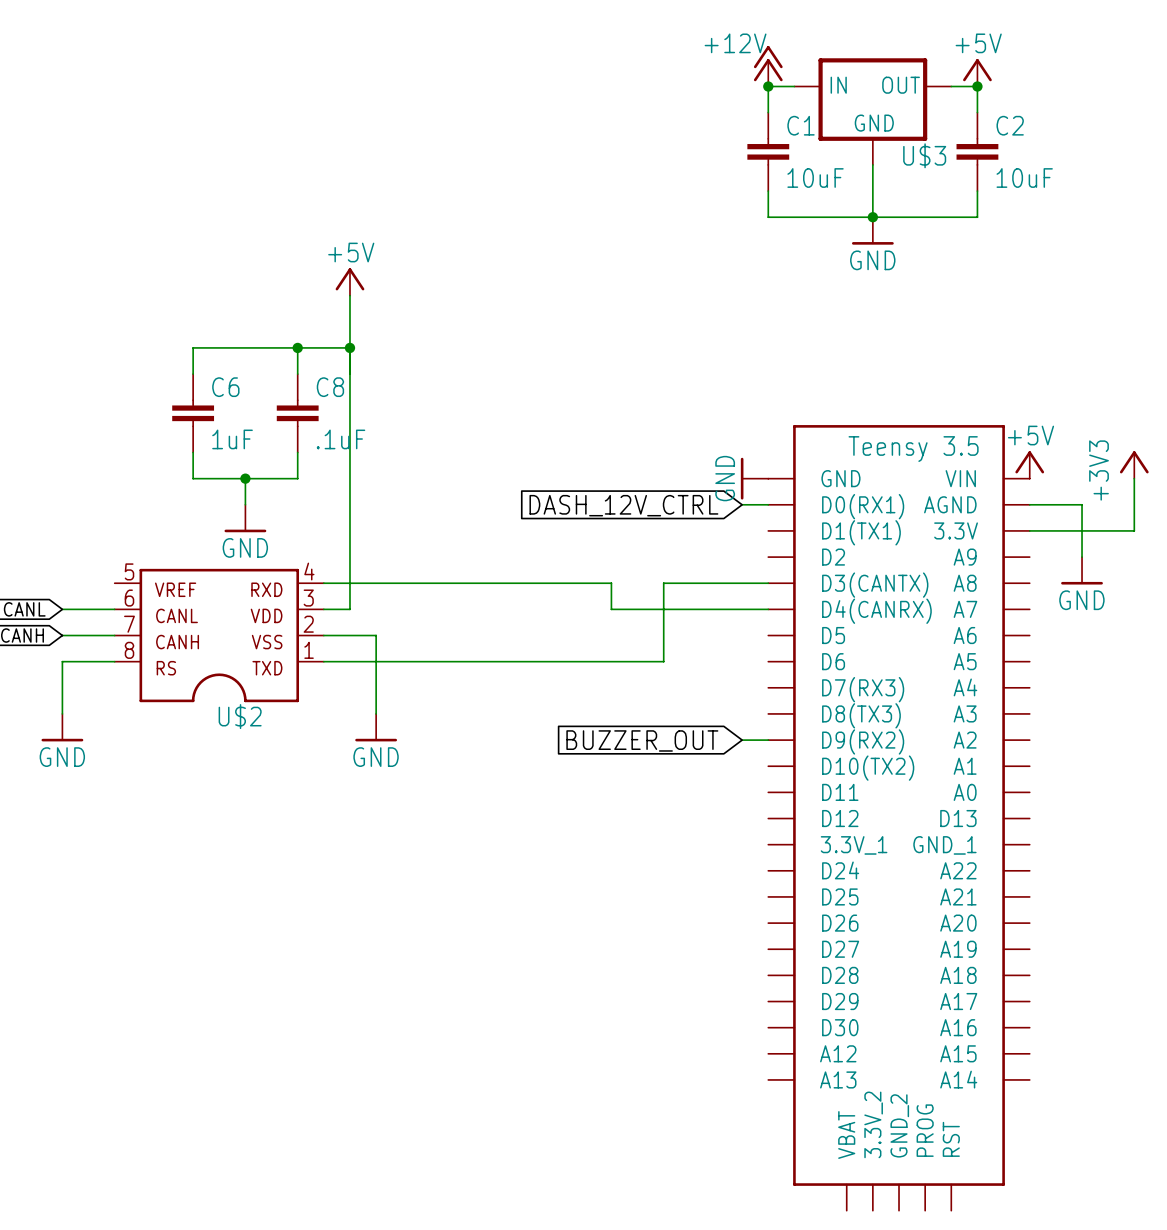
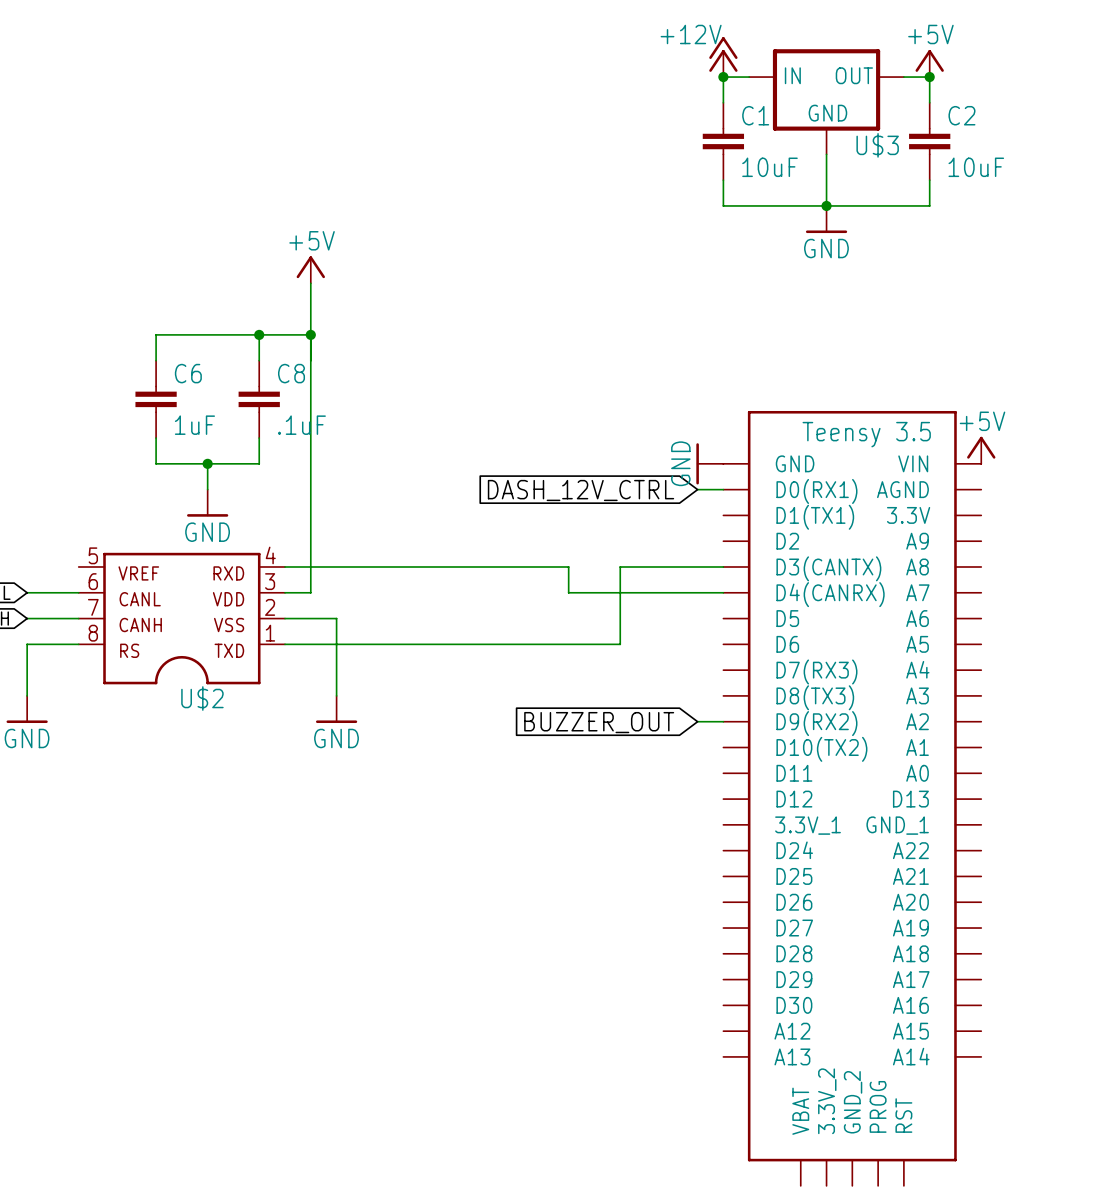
power symbol: +3V3 (1134, 464) -> none
wire: (1134, 478) (1134, 530) (1029, 530) -> none
wire: (1029, 504) (1082, 504) (1082, 557) -> none
power symbol: GND (1082, 570) -> none

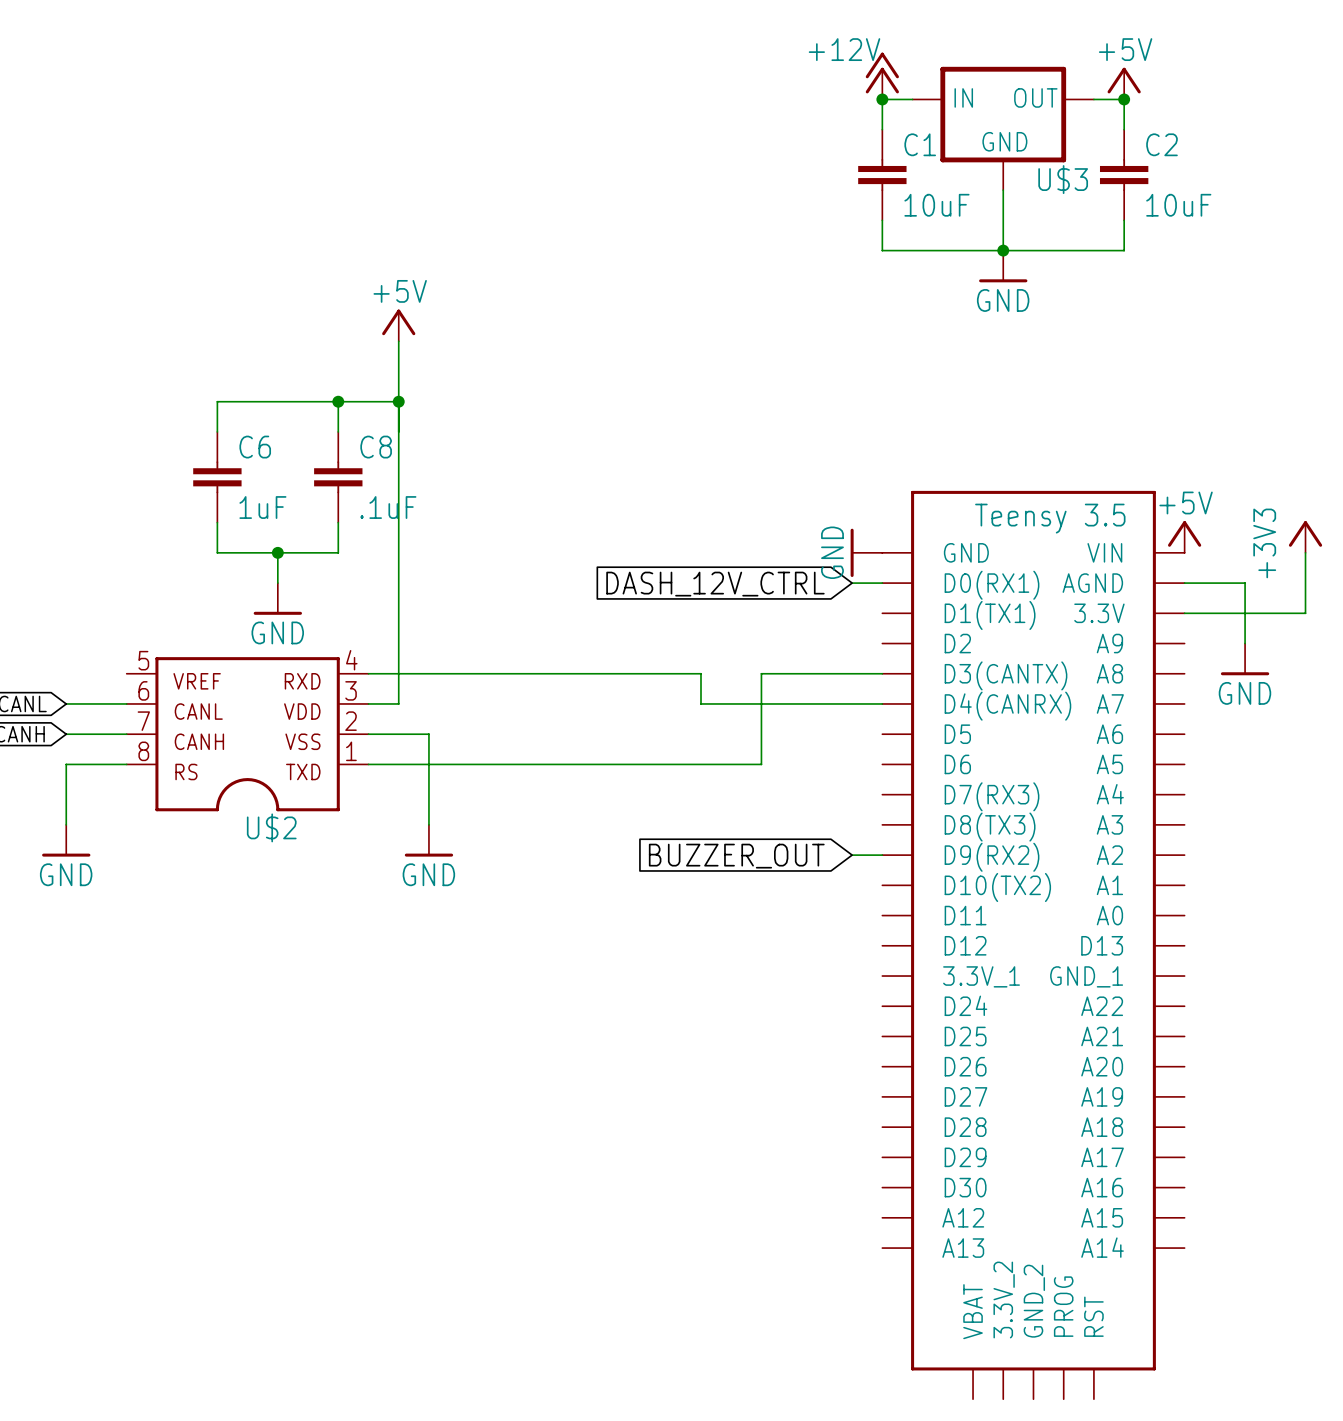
power symbol: none -> +3V3 (1305, 536)
wire: none -> (1305, 552) (1305, 613) (1184, 613)
wire: none -> (1184, 583) (1245, 583) (1245, 643)
power symbol: none -> GND (1245, 659)

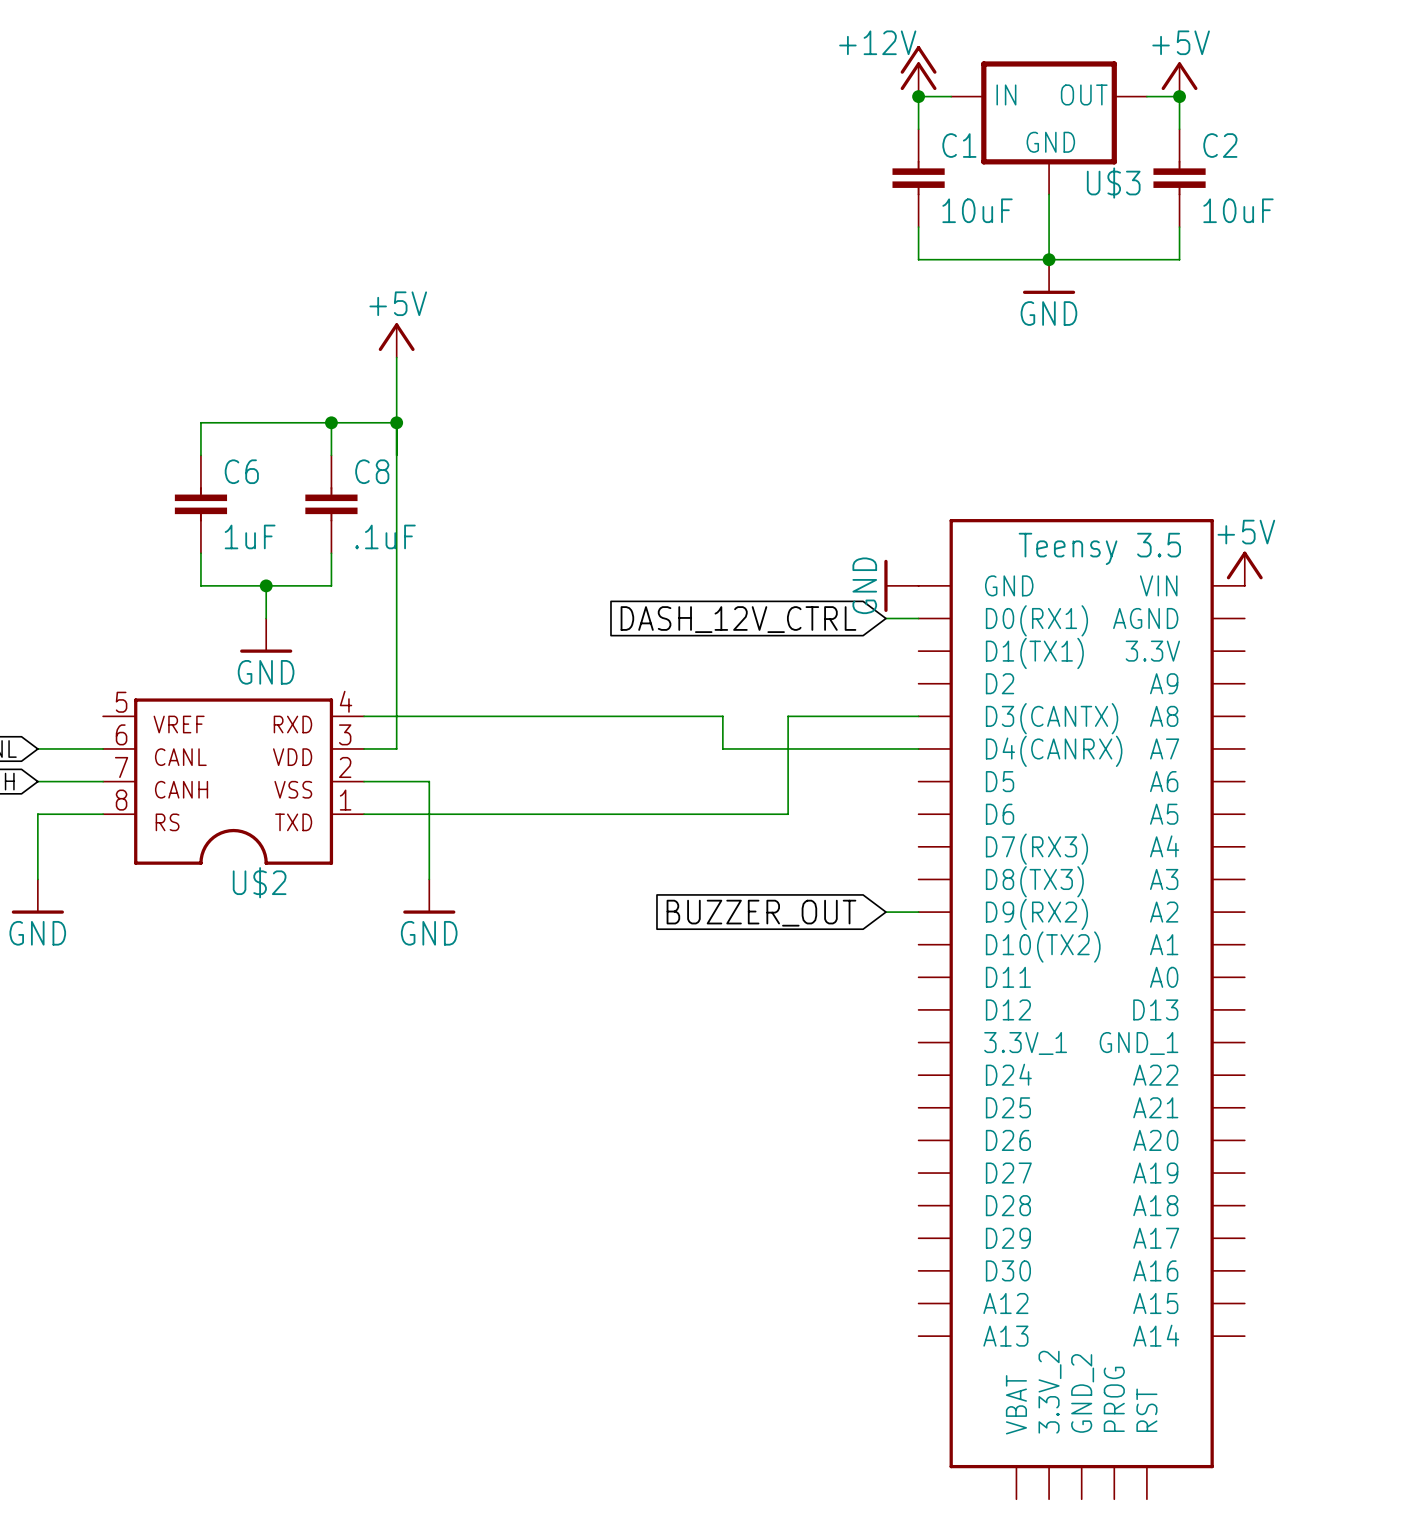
power symbol: +3V3 (1305, 536) -> none
wire: (1305, 552) (1305, 613) (1184, 613) -> none
wire: (1184, 583) (1245, 583) (1245, 643) -> none
power symbol: GND (1245, 659) -> none

